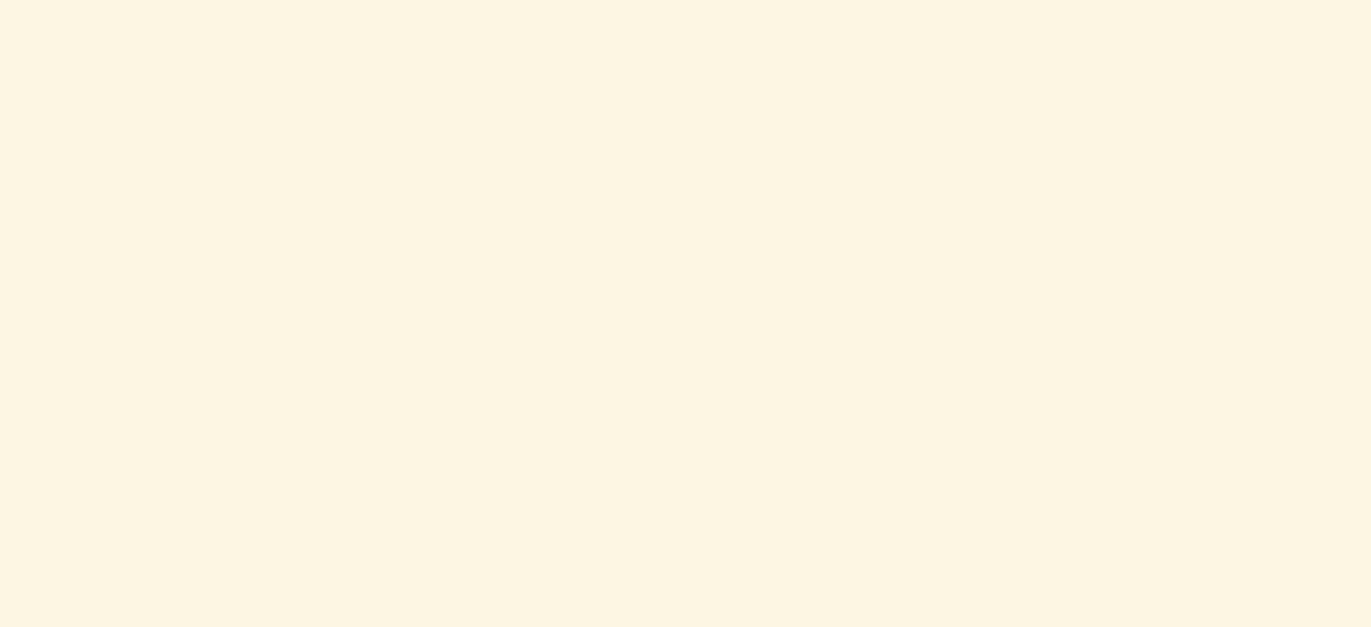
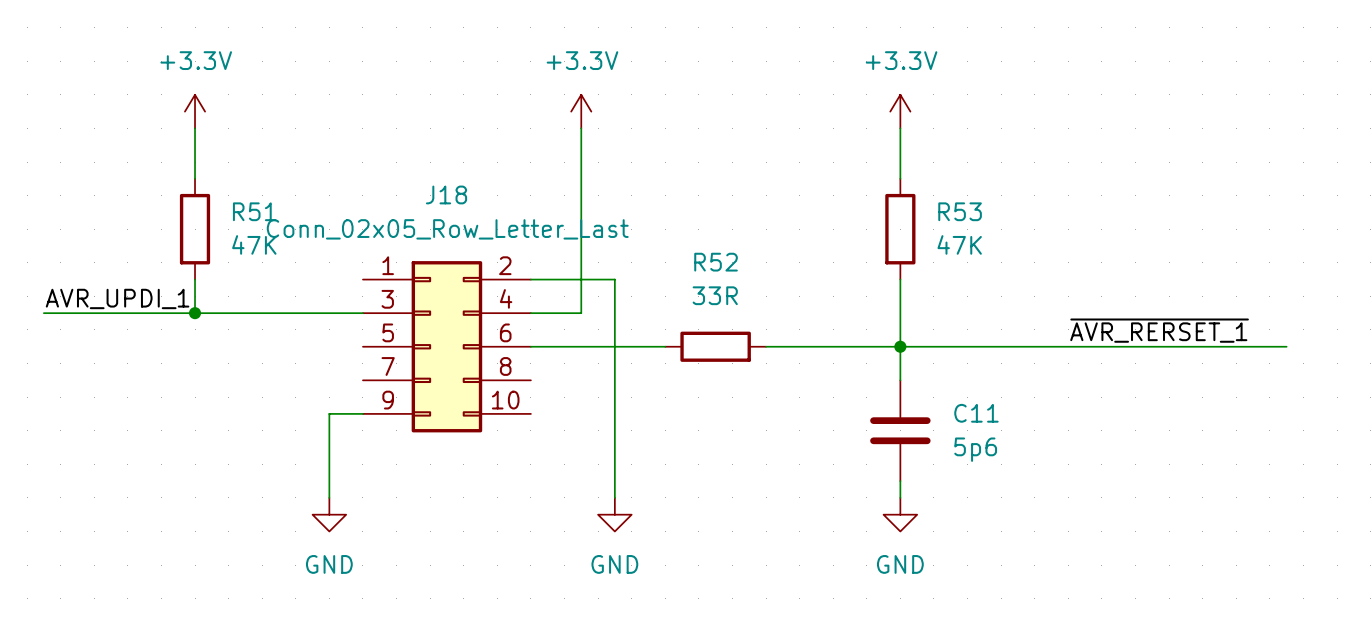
power symbol: none -> +3.3V (195, 111)
power symbol: none -> +3.3V (581, 111)
power symbol: none -> +3.3V (900, 111)
wire: none -> (195, 128) (195, 178)
wire: none -> (581, 128) (581, 313) (530, 313)
wire: none -> (900, 128) (900, 178)
R51: none -> 47K (195, 229)
R53: none -> 47K (900, 229)
wire: none -> (195, 279) (195, 313)
wire: none -> (530, 279) (614, 279) (614, 497)
wire: none -> (900, 279) (900, 380)
label: none -> AVR_UPDI_1 (117, 298)
wire: none -> (43, 313) (362, 313)
junction: none -> (195, 313)
label: none -> ~{AVR_RERSET_1} (1159, 330)
J18: none -> Conn_02x05_Row_Letter_Last (446, 346)
wire: none -> (530, 346) (665, 346)
R52: none -> 33R (715, 346)
wire: none -> (766, 346) (1286, 346)
junction: none -> (900, 346)
wire: none -> (362, 413) (329, 413) (329, 497)
C11: none -> 5p6 (900, 430)
wire: none -> (900, 481) (900, 497)
power symbol: none -> GND (329, 514)
power symbol: none -> GND (614, 514)
power symbol: none -> GND (900, 514)

